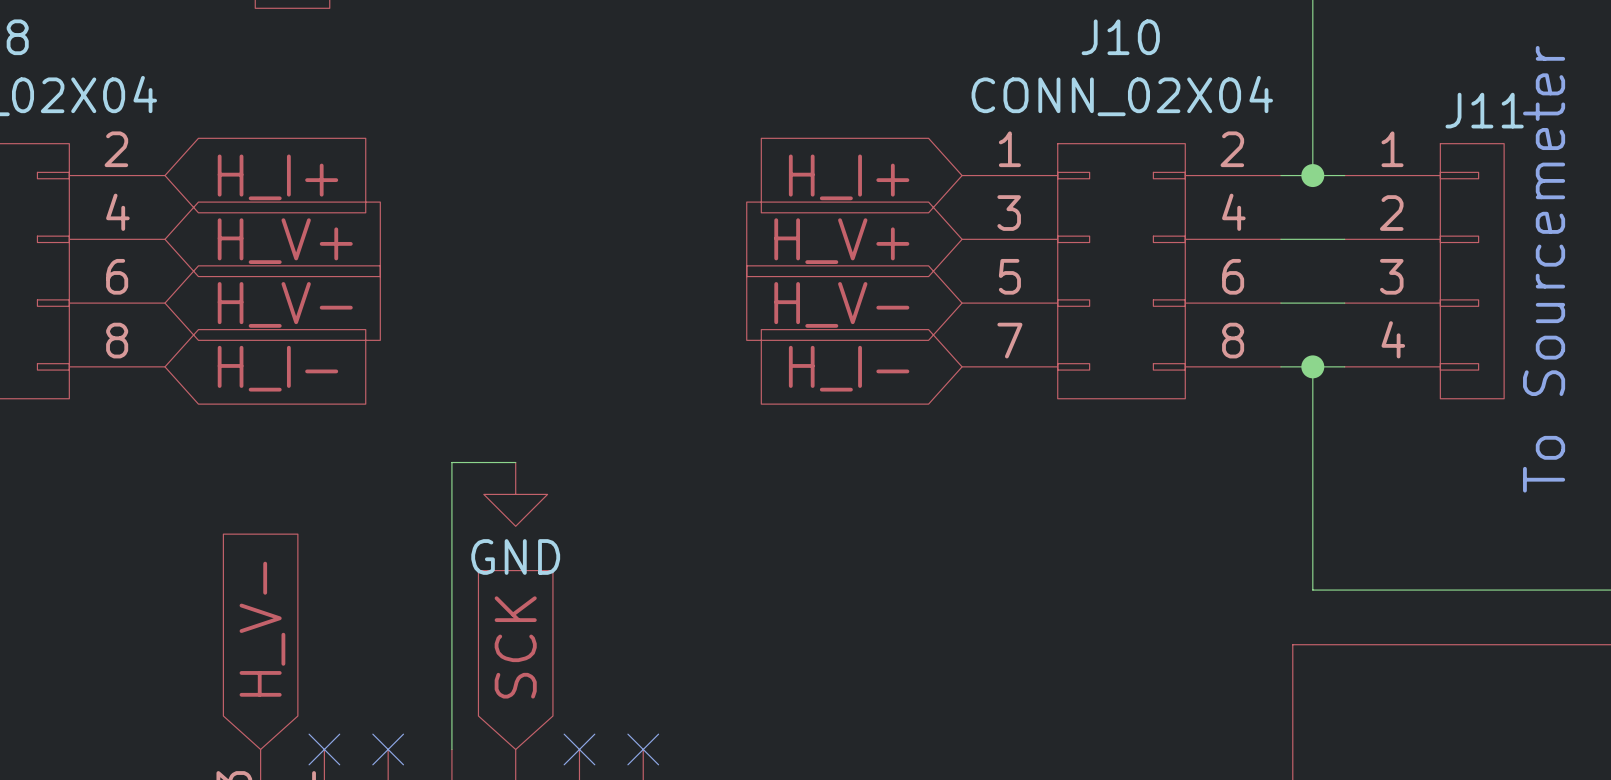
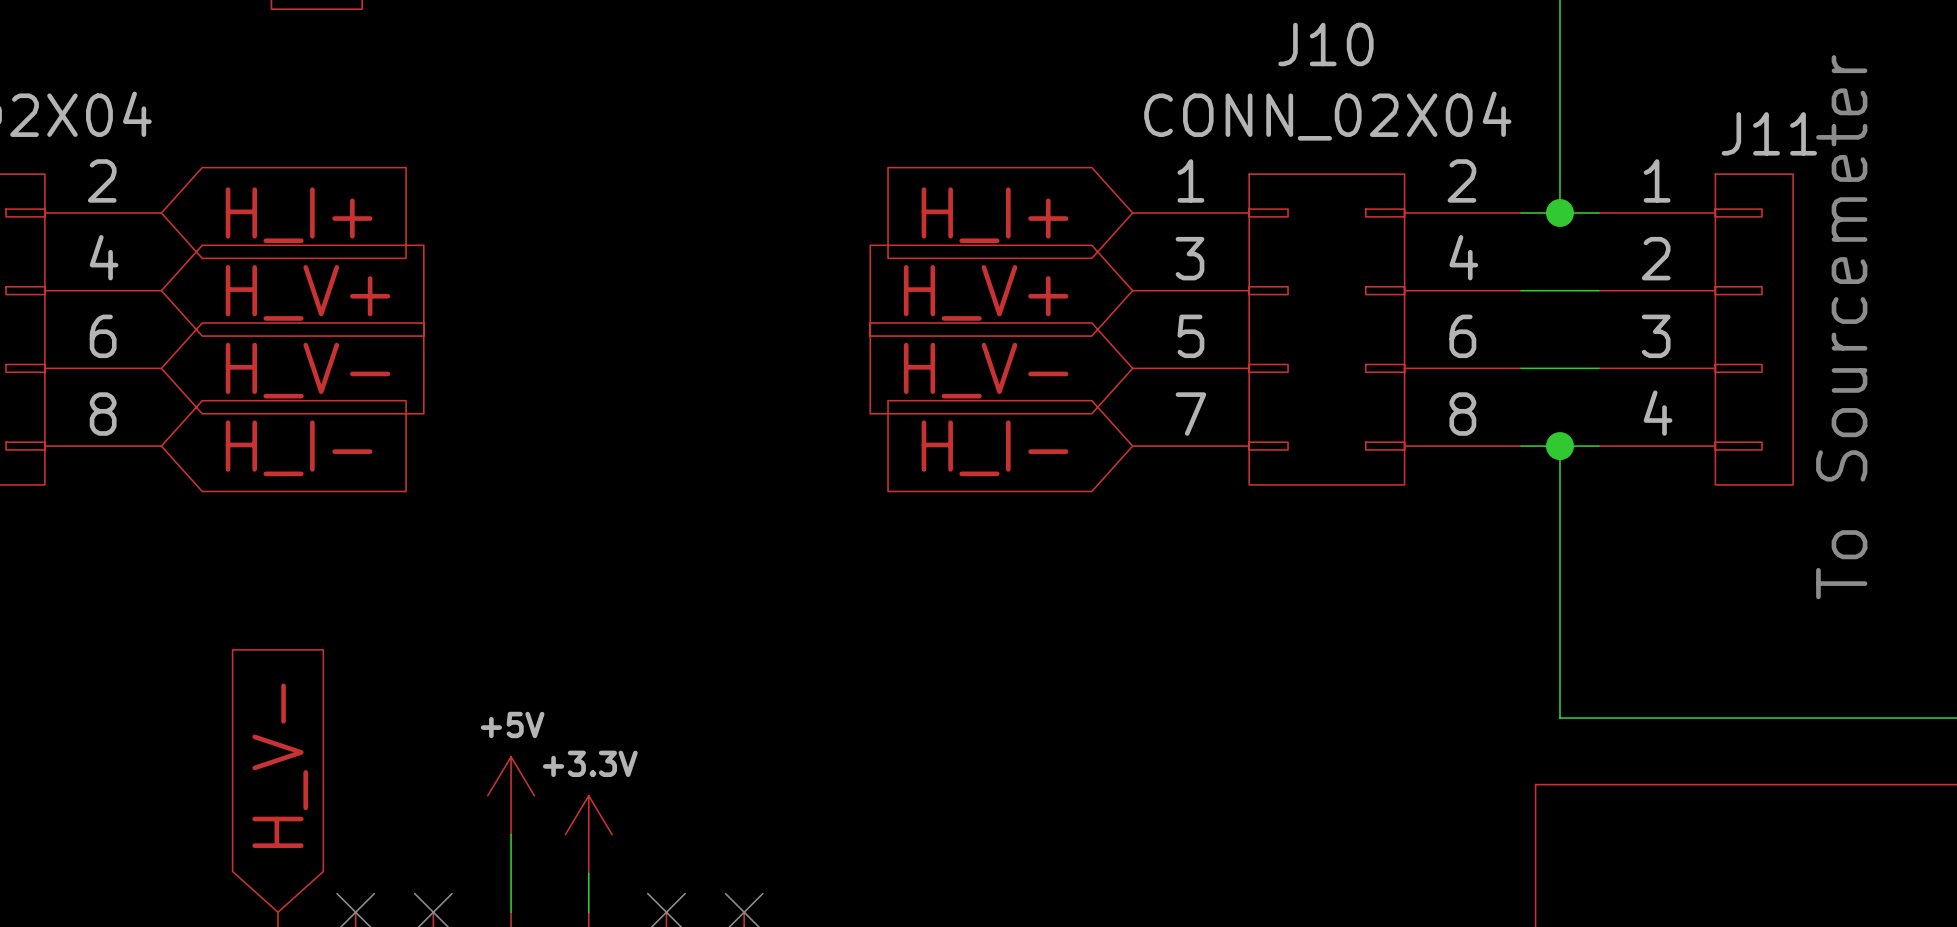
wire: (515, 462) (451, 462) (451, 685) -> none
power symbol: GND (515, 494) -> none
global label: SCK (515, 647) -> none
power symbol: none -> +5V (511, 795)
power symbol: none -> +3.3V (588, 834)
wire: none -> (588, 873) (588, 912)

